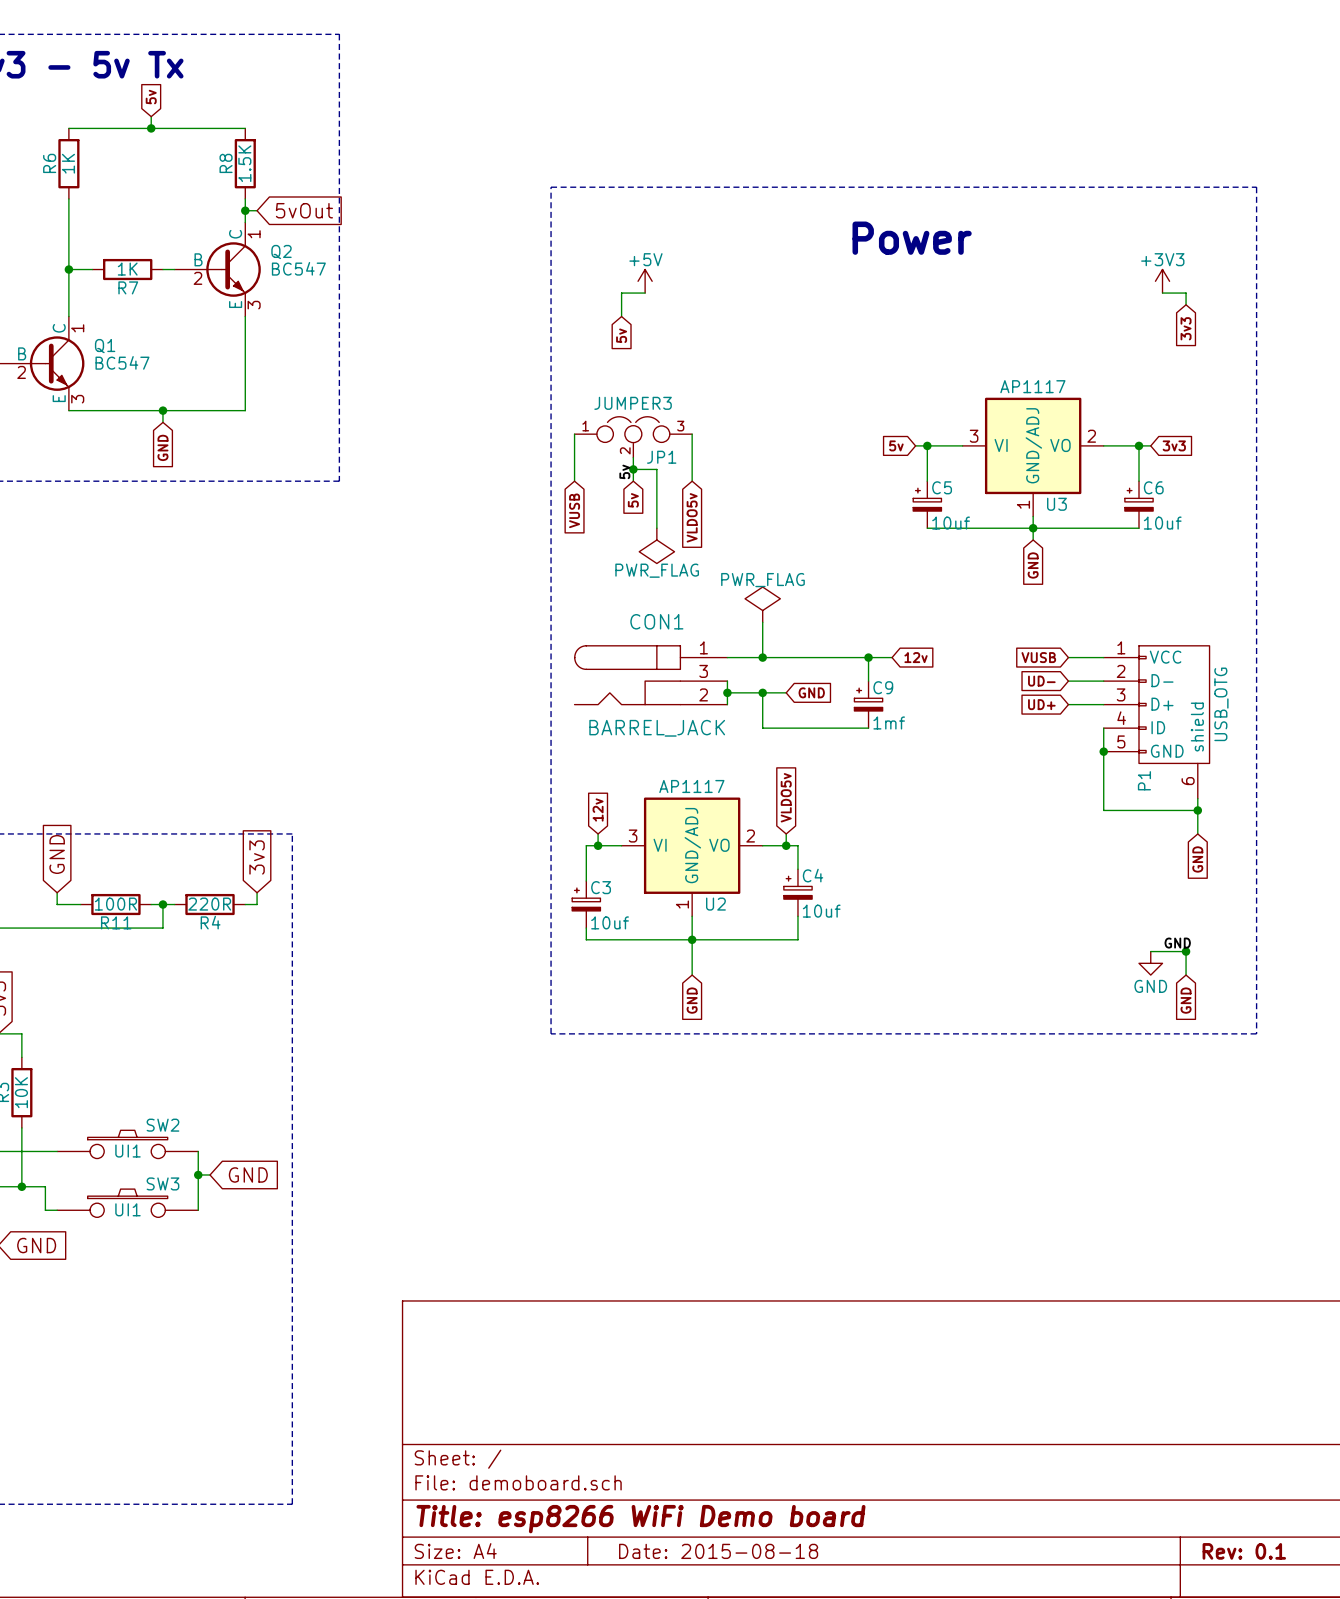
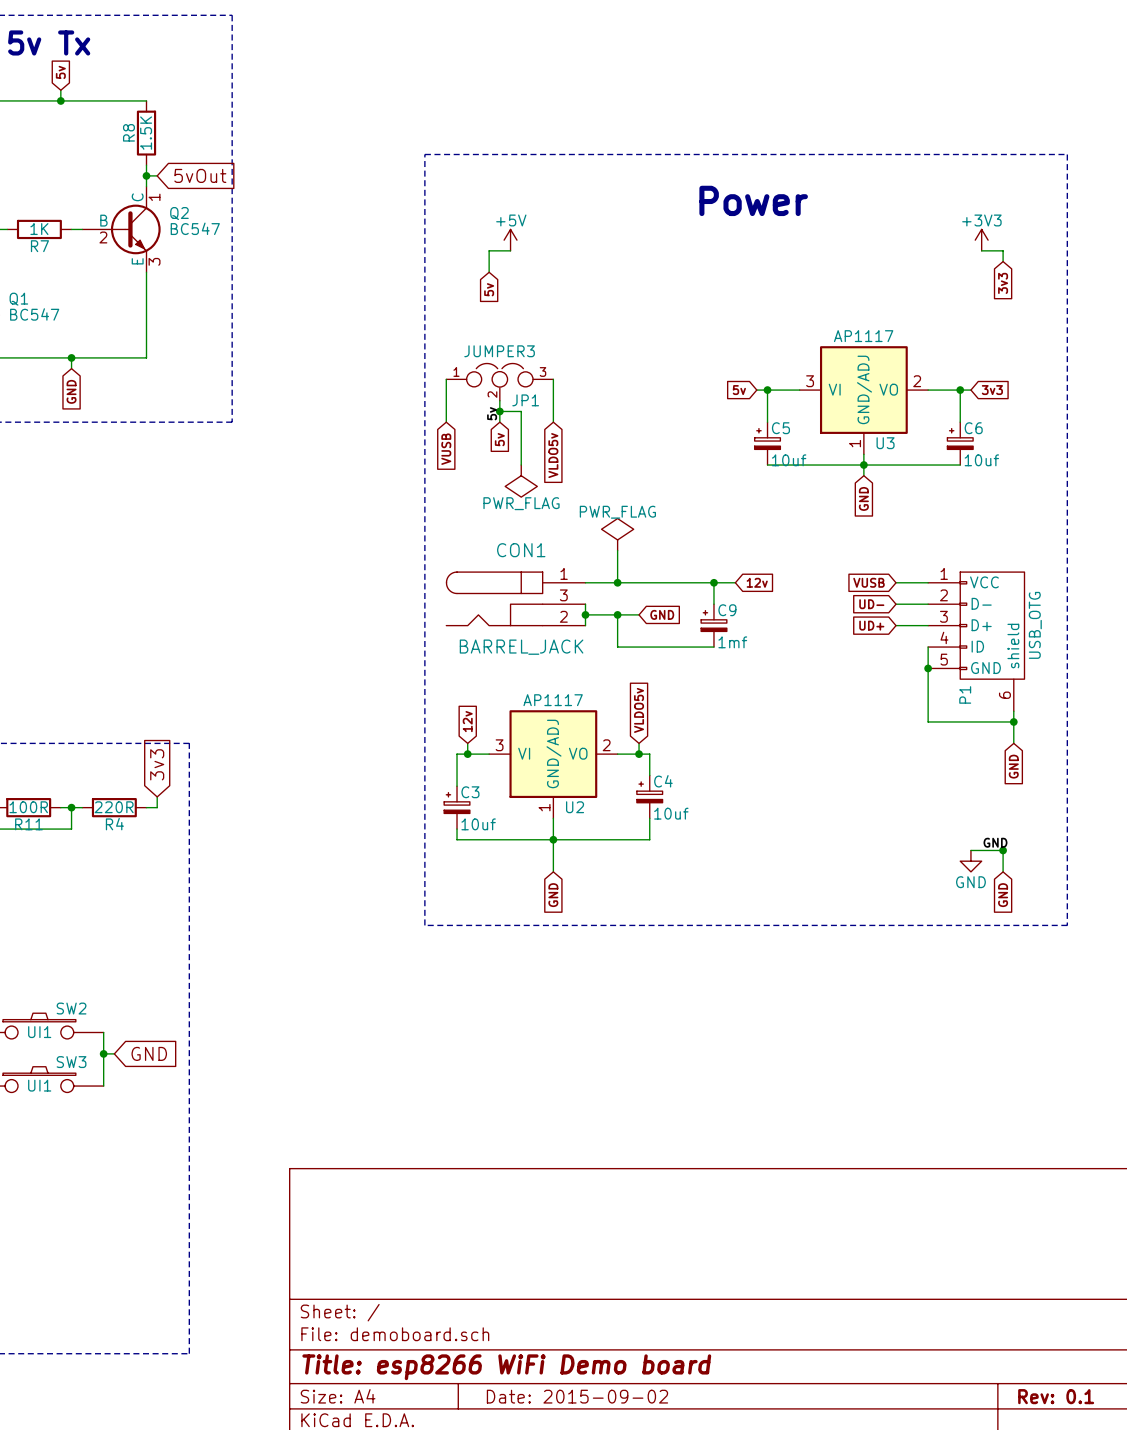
title block: Date: 2015-08-18 (718, 1551) -> Date: 2015-09-02 (577, 1396)

